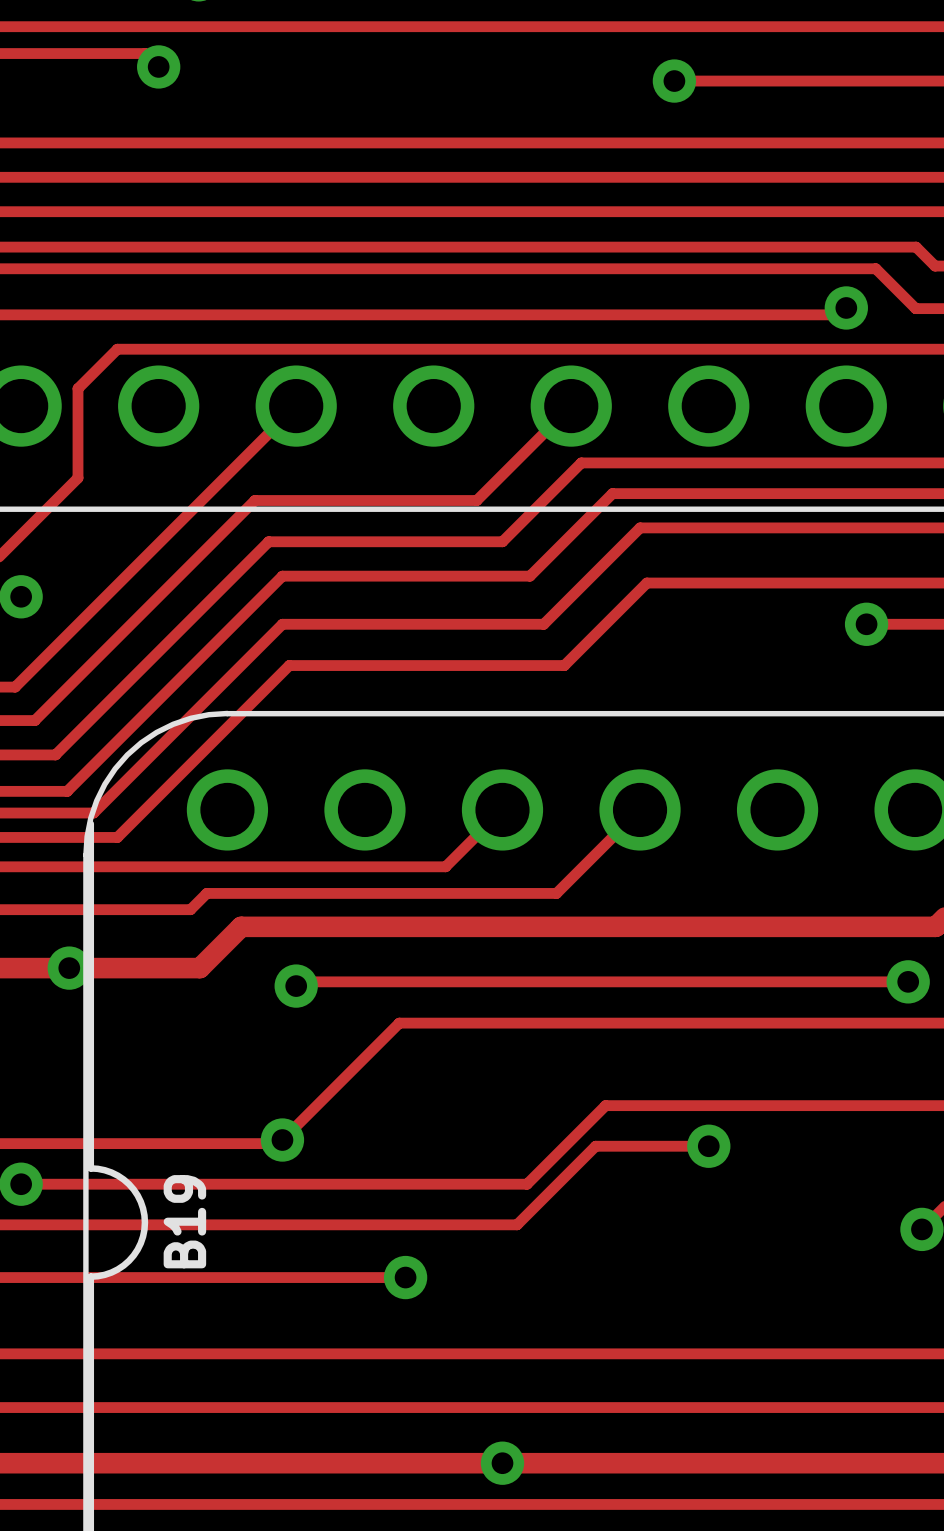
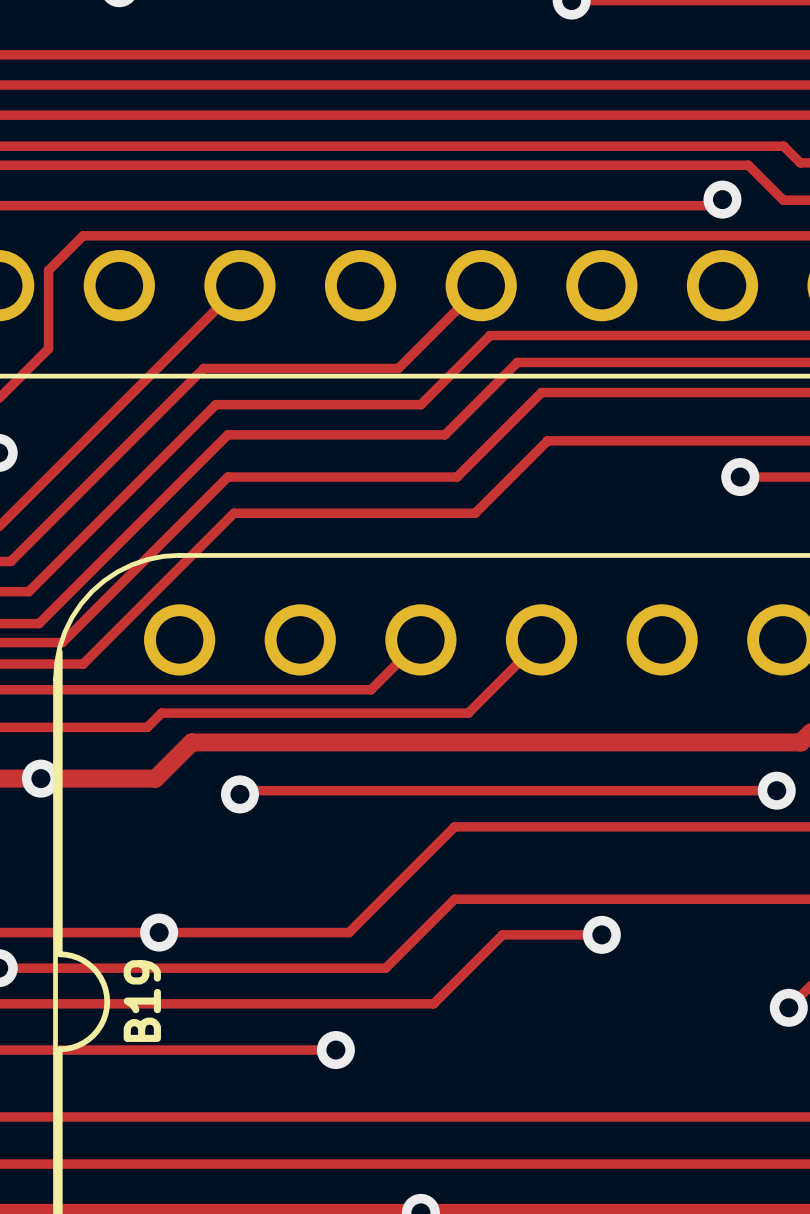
track: (541, 1023) (399, 1023) (278, 1143) -> (454, 826) (348, 932) (224, 932)
track: (605, 1105) (527, 1184) (462, 1184) -> (511, 899) (454, 899) (385, 968)
via position: (282, 1140) -> (159, 932)

